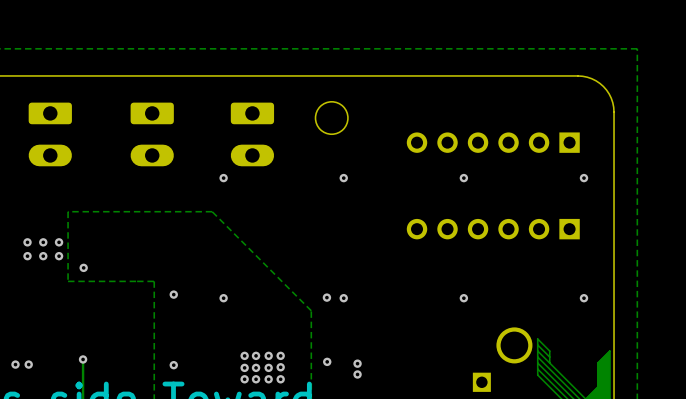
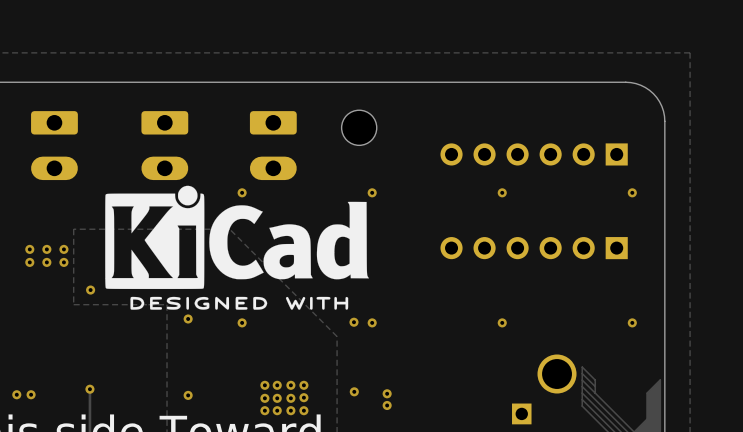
drawing: none -> [105, 185, 369, 310]
via: none -> (29, 249)
via: none -> (46, 249)
via: none -> (63, 249)
via: (27, 256) -> none
via: (43, 256) -> none
via: (59, 256) -> none

